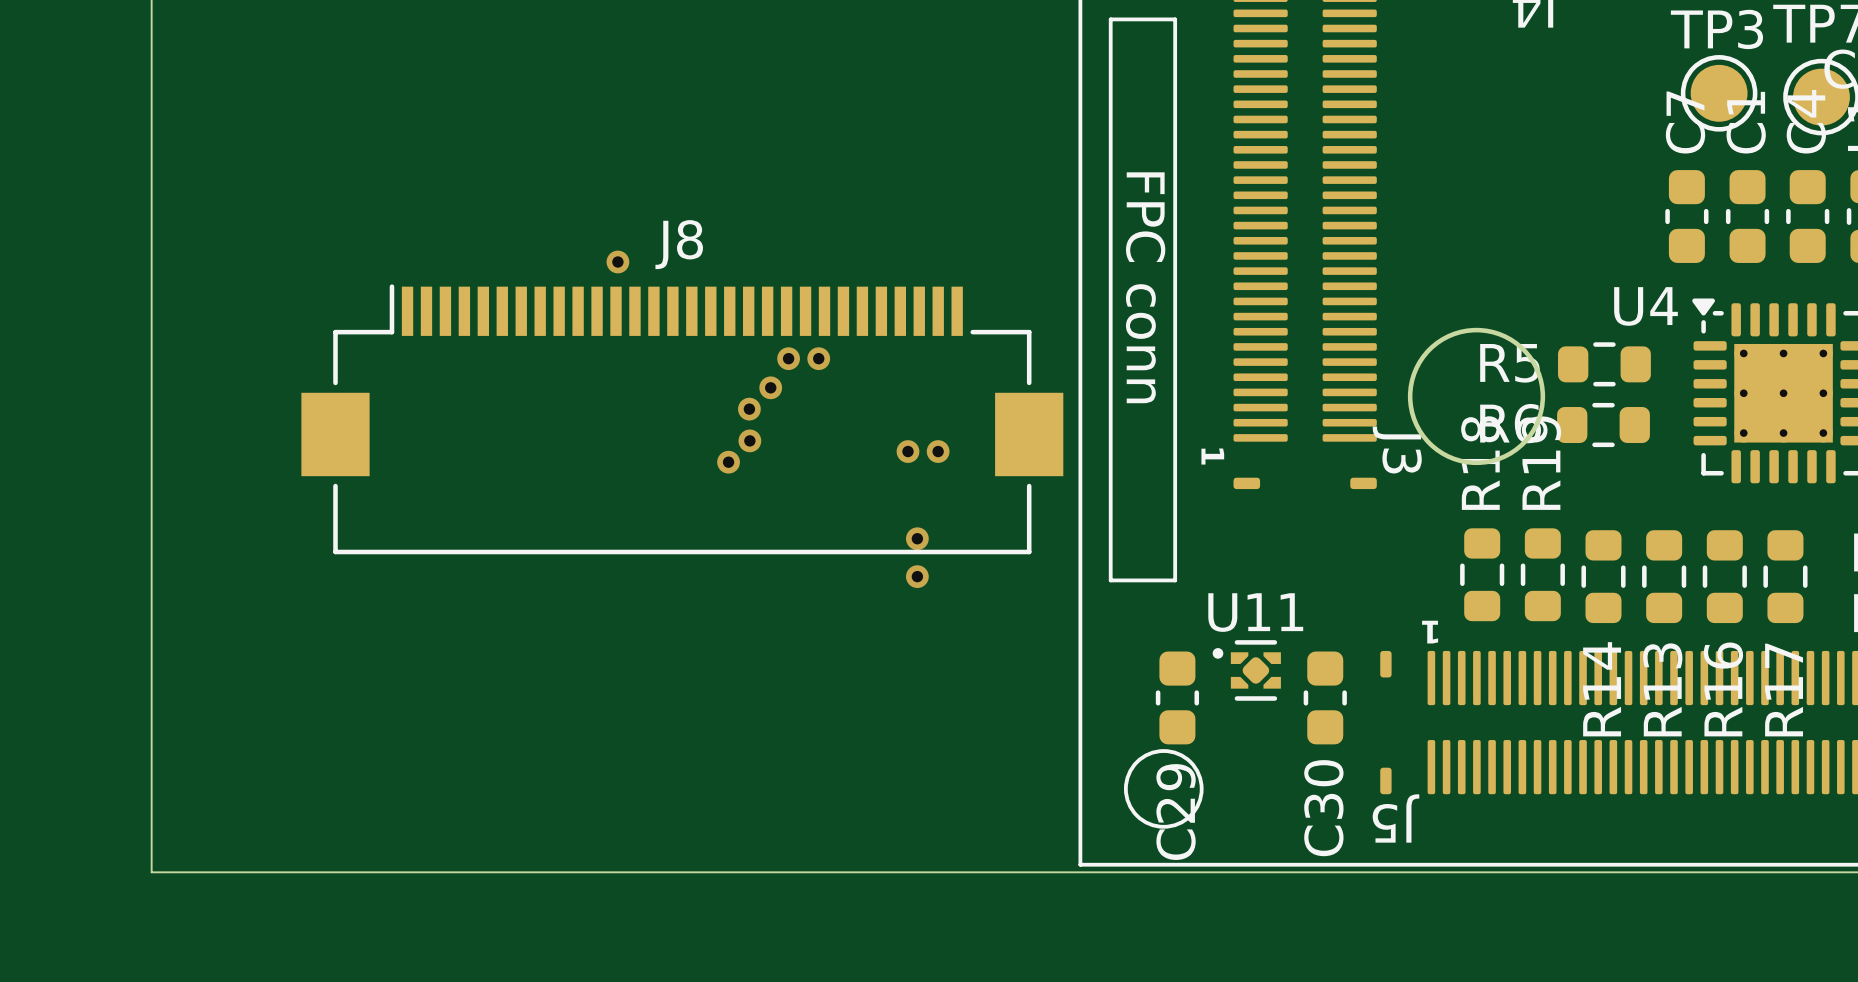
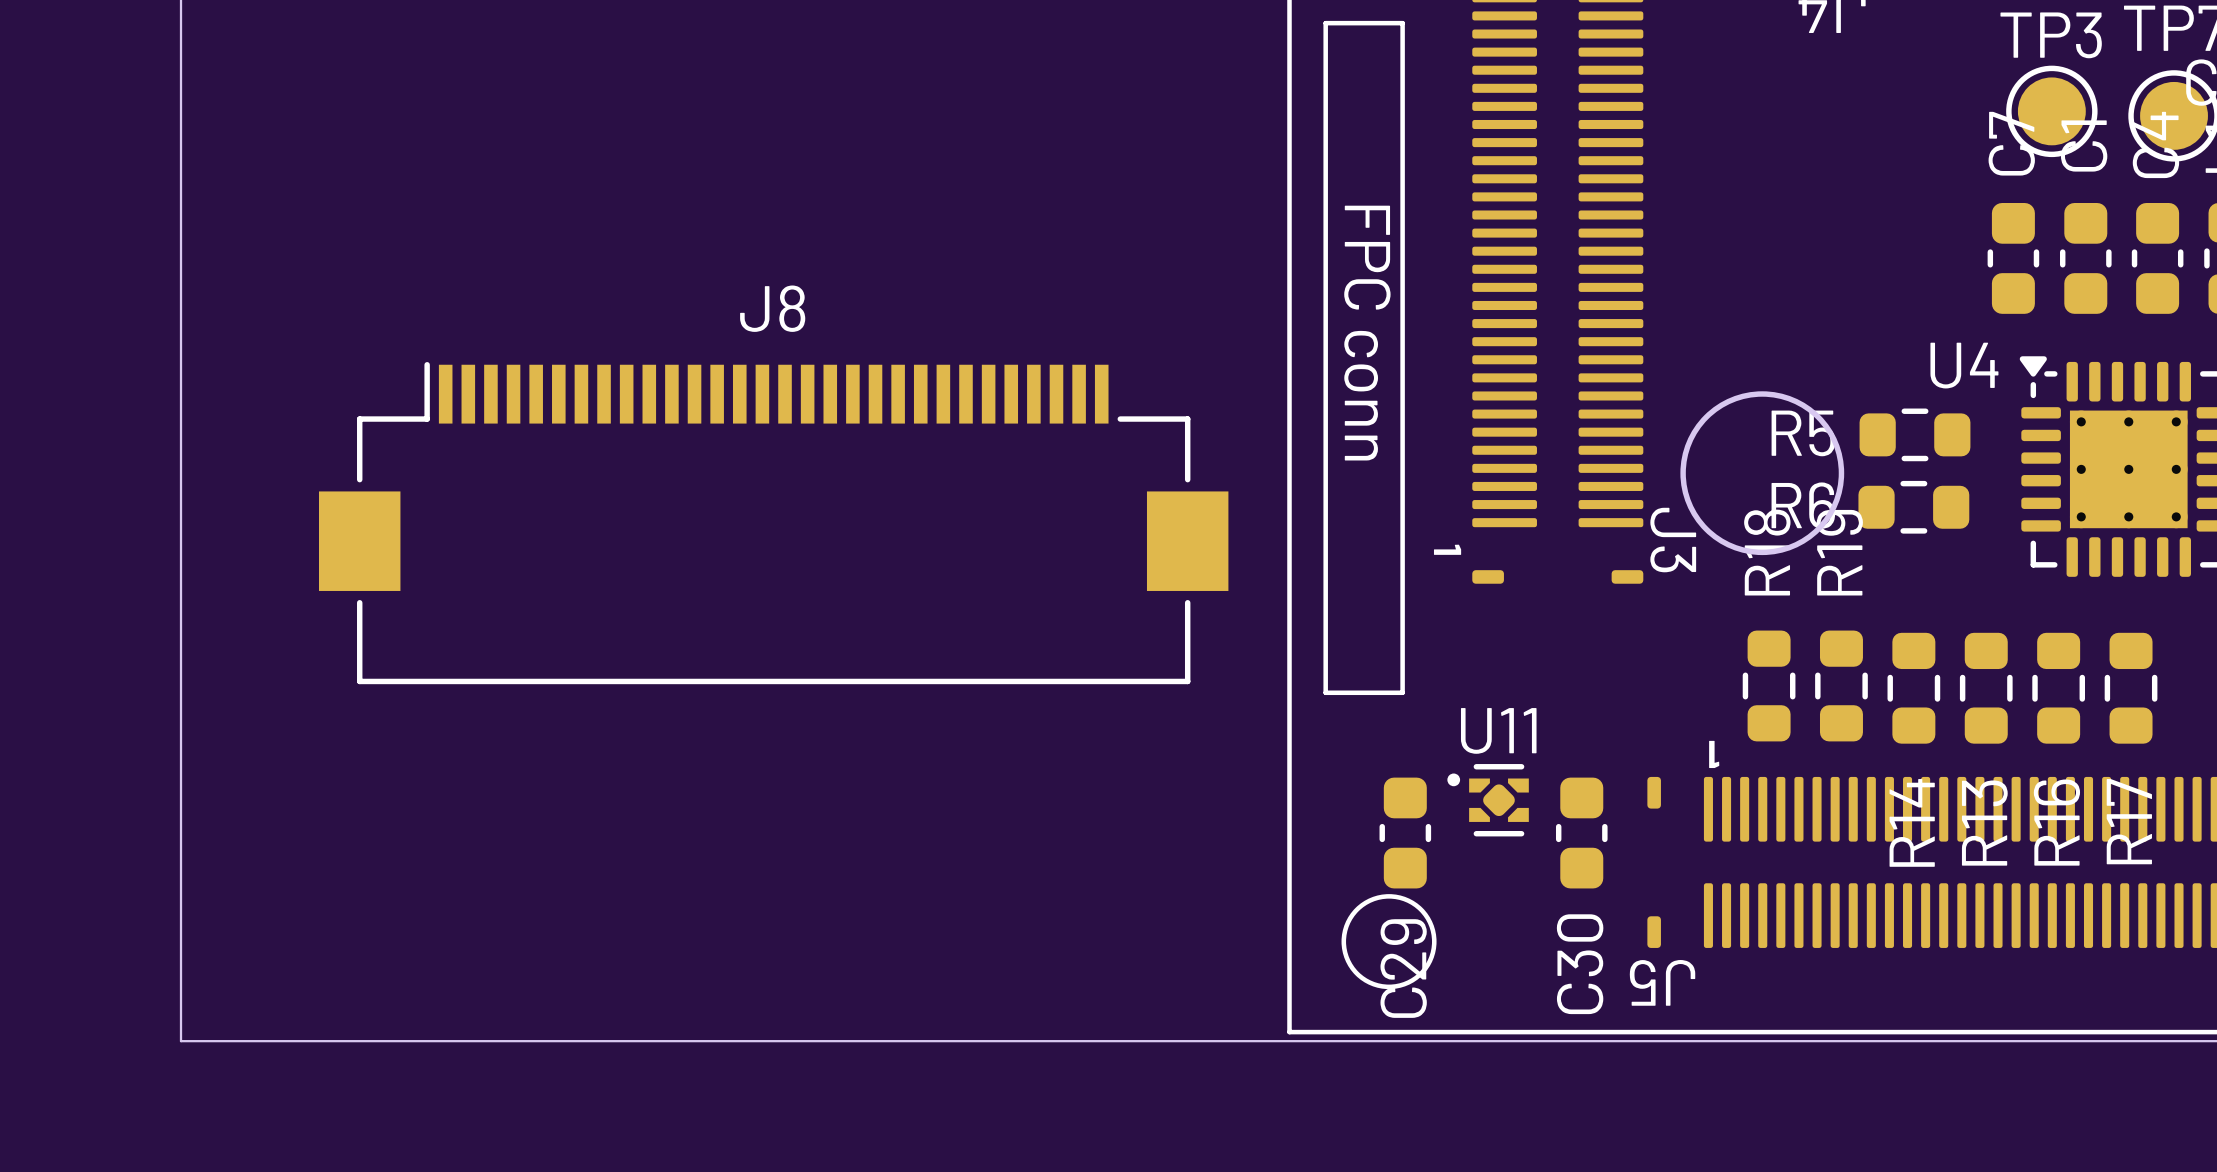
via: (617, 262) -> none
via: (788, 358) -> none
via: (818, 358) -> none
via: (770, 387) -> none
via: (749, 409) -> none
J8 position: (682, 419) -> (773, 523)
via: (749, 440) -> none
via: (907, 451) -> none
via: (938, 451) -> none
via: (728, 462) -> none
via: (917, 538) -> none
via: (917, 576) -> none

